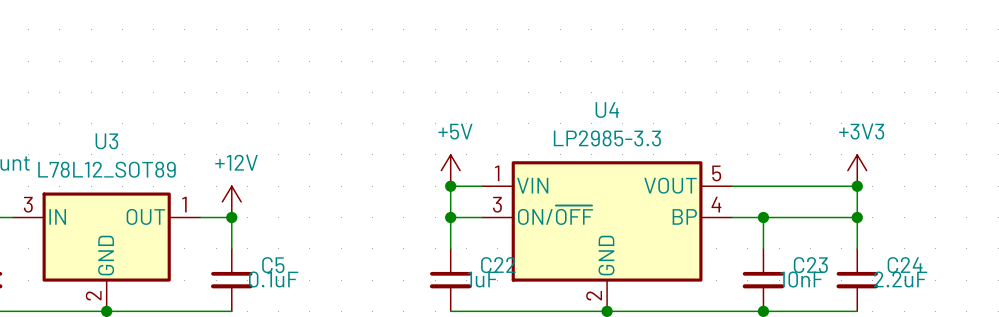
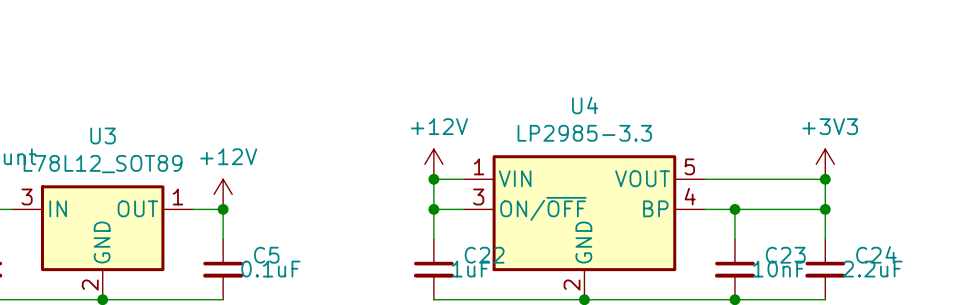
power symbol: +5V (450, 170) -> +12V (433, 164)

